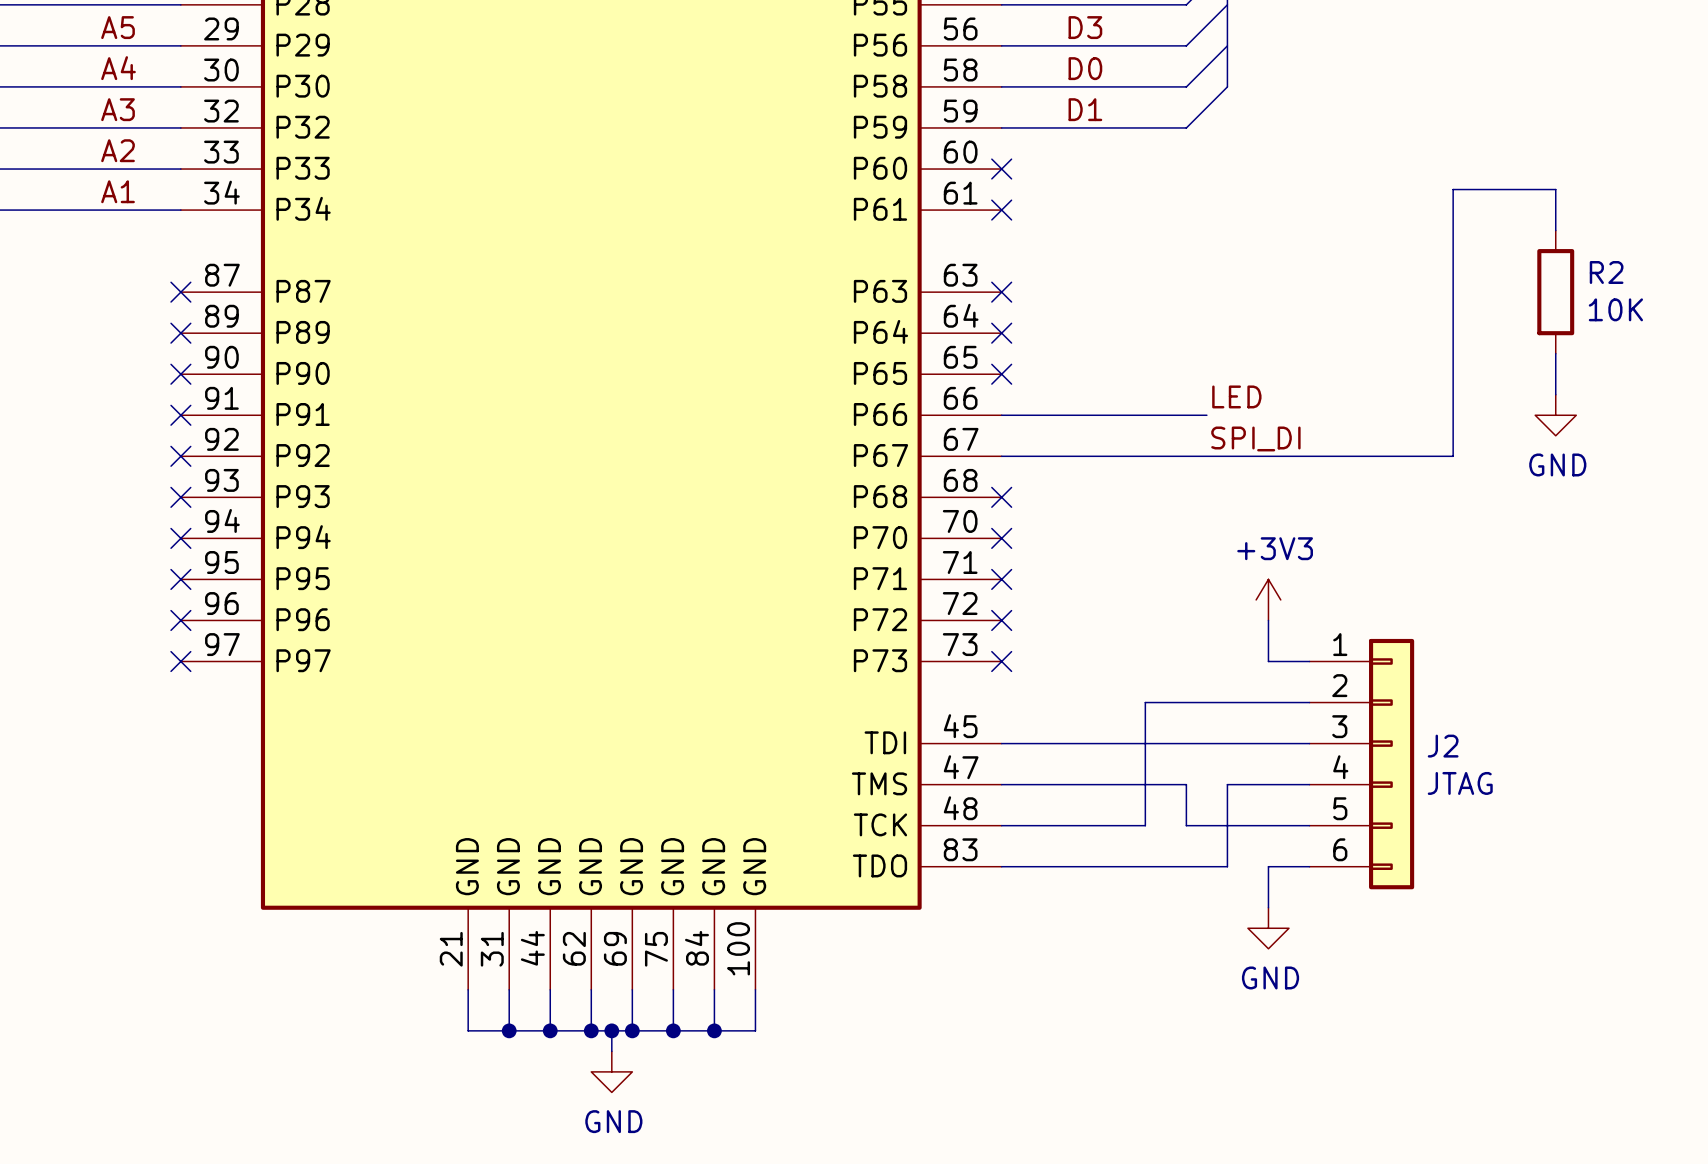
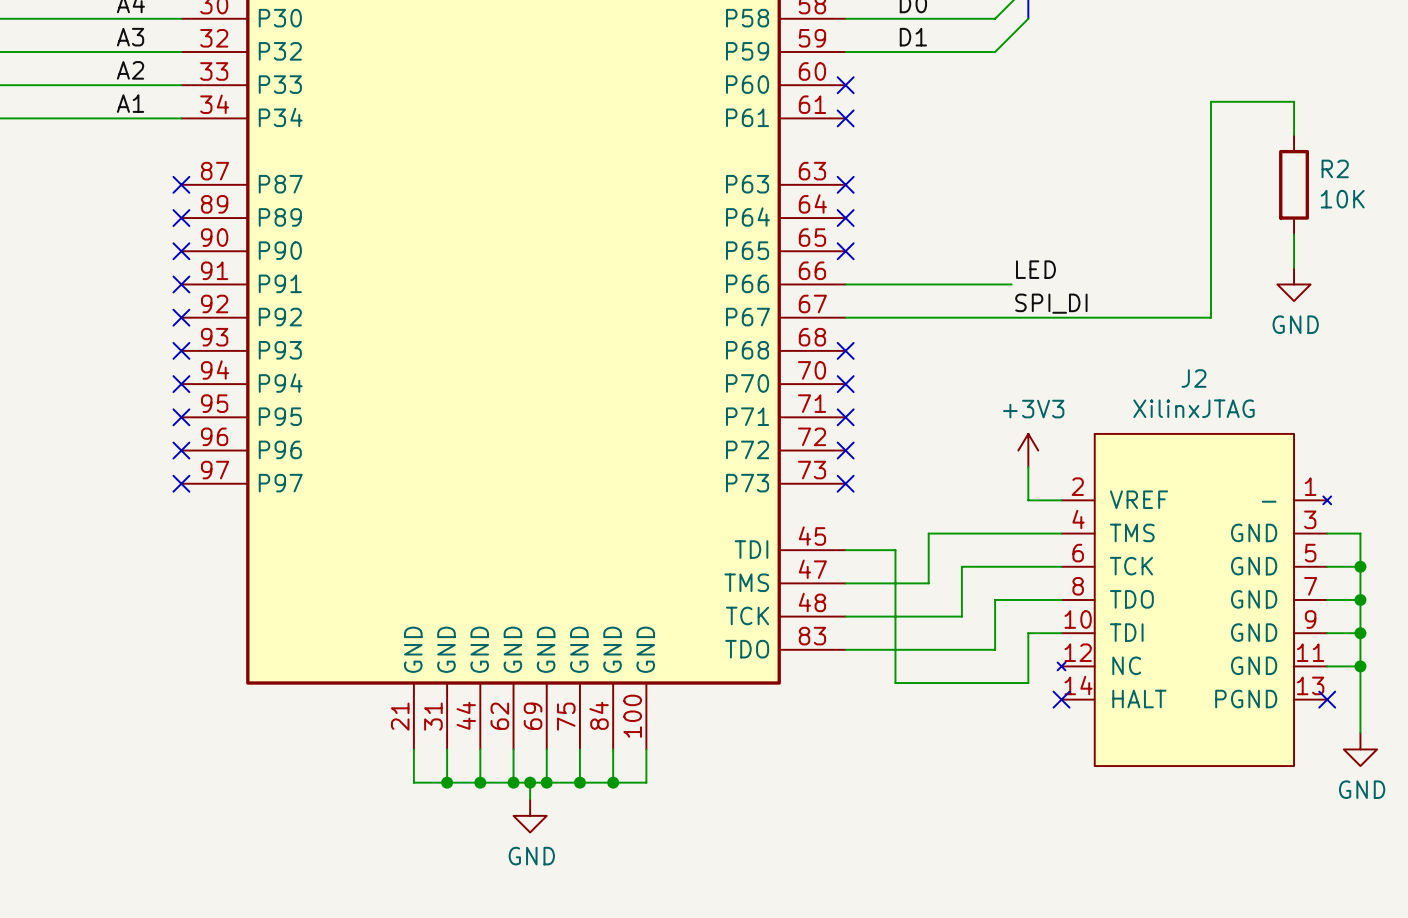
power symbol position: +3V3 (1268, 599) -> +3V3 (1028, 450)
wire: (1268, 620) (1268, 661) (1309, 661) -> (1028, 467) (1028, 500) (1061, 500)
J2 symbol: [1309, 638, 1415, 890] -> [1057, 433, 1332, 767]
wire: (1309, 702) (1145, 702) (1145, 764) -> (1061, 566) (961, 566)
wire: none -> (1327, 533) (1360, 533) (1360, 732)
wire: (1063, 743) (1309, 743) -> (895, 550) (895, 683) (1028, 683) (1028, 649)
J2 name position: J2 (1443, 746) -> J2 (1193, 378)
wire: none -> (1327, 566) (1360, 566)
junction: none -> (1360, 566)
J2 value: JTAG (1460, 783) -> XilinxJTAG (1193, 408)
wire: (1104, 784) (1186, 784) (1186, 805) -> (928, 583) (928, 533) (1061, 533)
wire: (1309, 784) (1227, 784) (1227, 846) -> (1061, 633) (1028, 633)
wire: none -> (995, 599) (1061, 599)
wire: none -> (1327, 599) (1360, 599)
junction: none -> (1360, 599)
wire: (1186, 825) (1309, 825) -> none
wire: none -> (1327, 633) (1360, 633)
junction: none -> (1360, 633)
wire: (1186, 866) (1227, 866) -> (995, 649) (995, 616)
wire: (1309, 866) (1268, 866) (1268, 907) -> none
wire: none -> (1327, 666) (1360, 666)
junction: none -> (1360, 666)
power symbol position: GND (1268, 928) -> GND (1360, 749)
no-connect mark: none -> (1061, 699)
no-connect mark: none -> (1327, 699)

